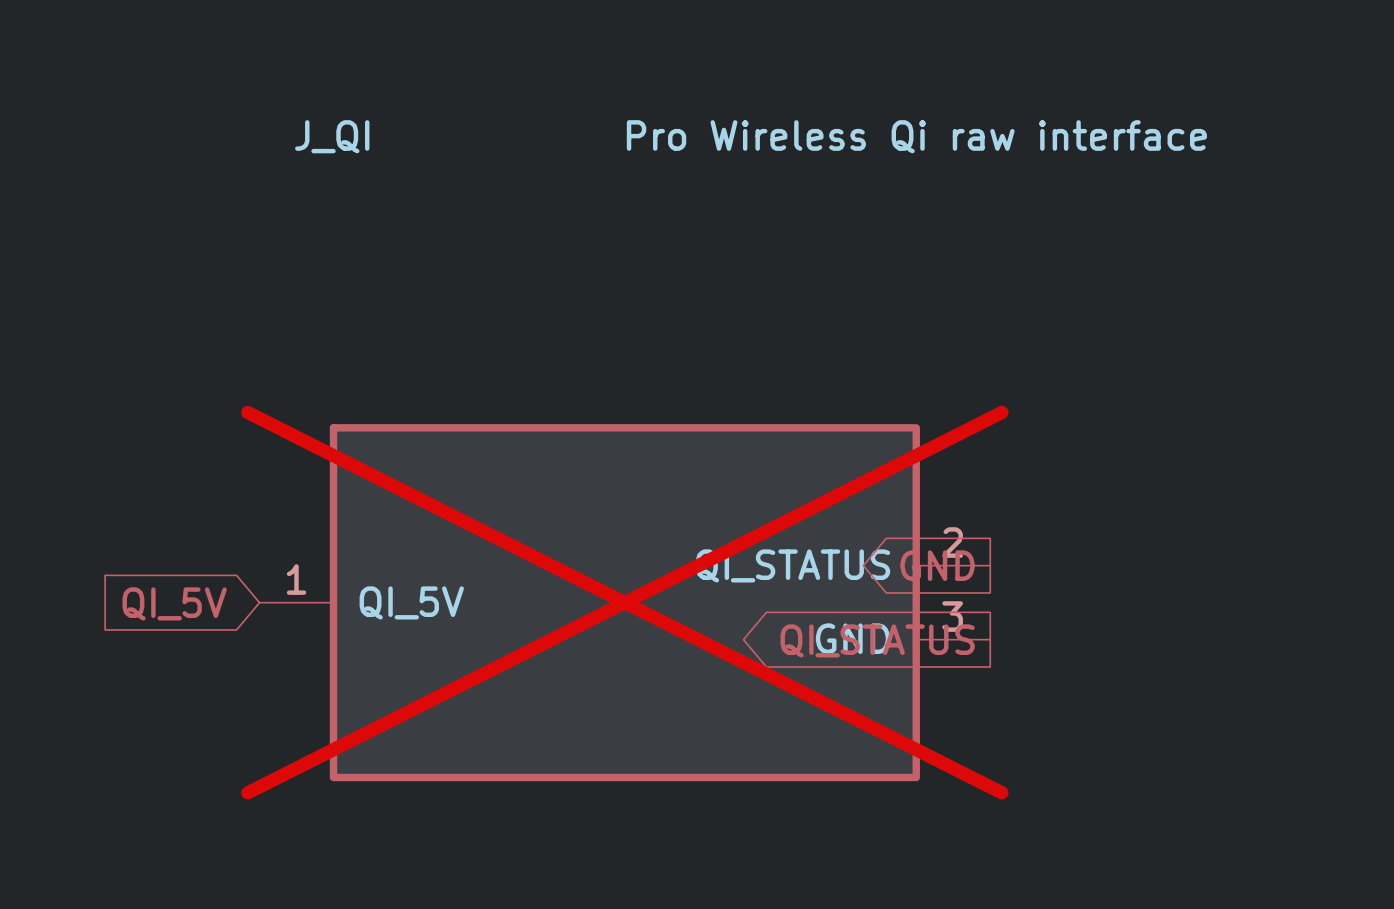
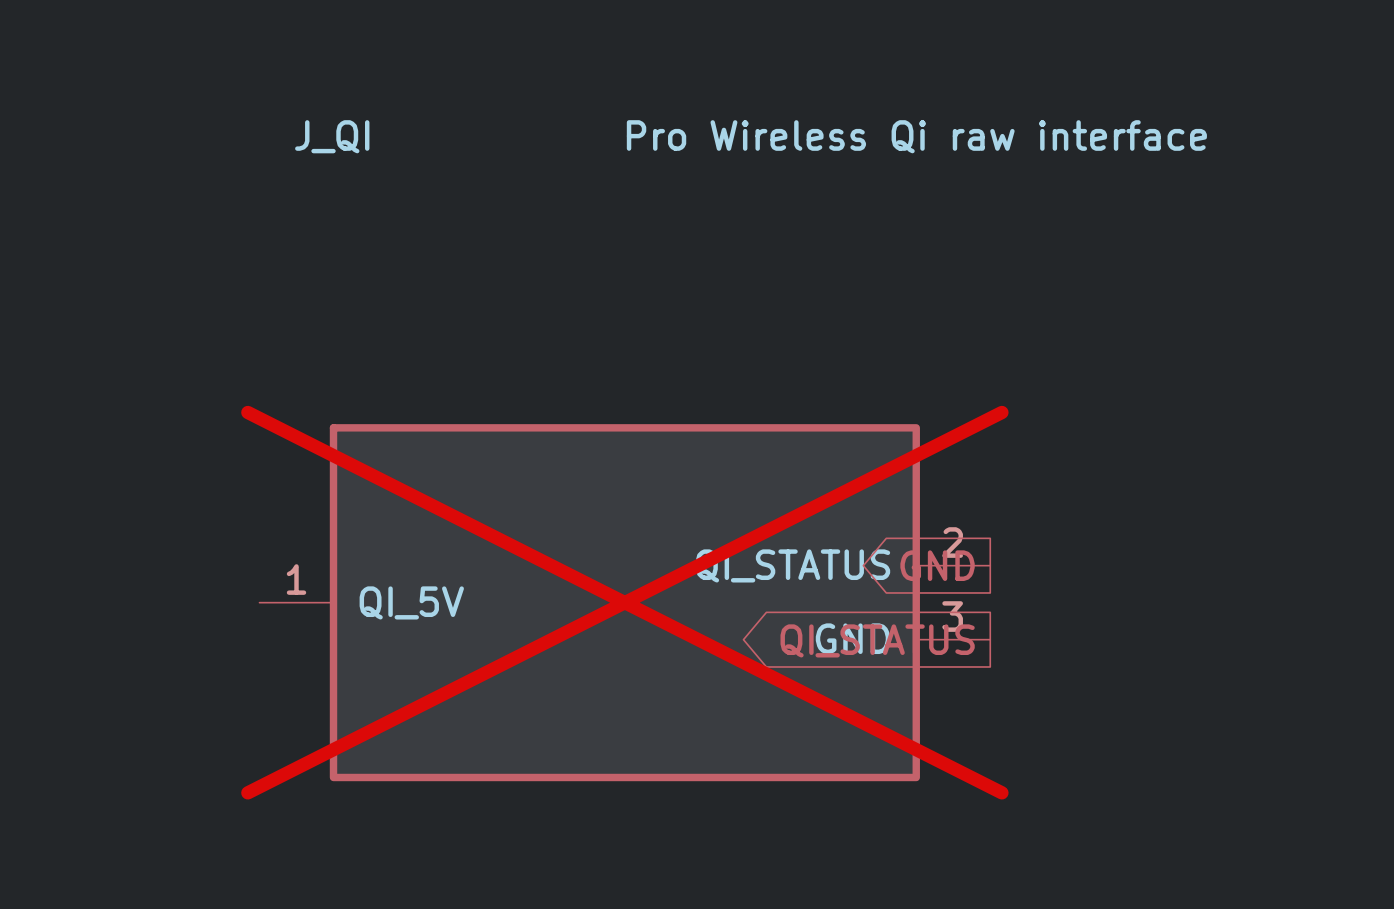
global label: QI_5V (174, 603) -> none

